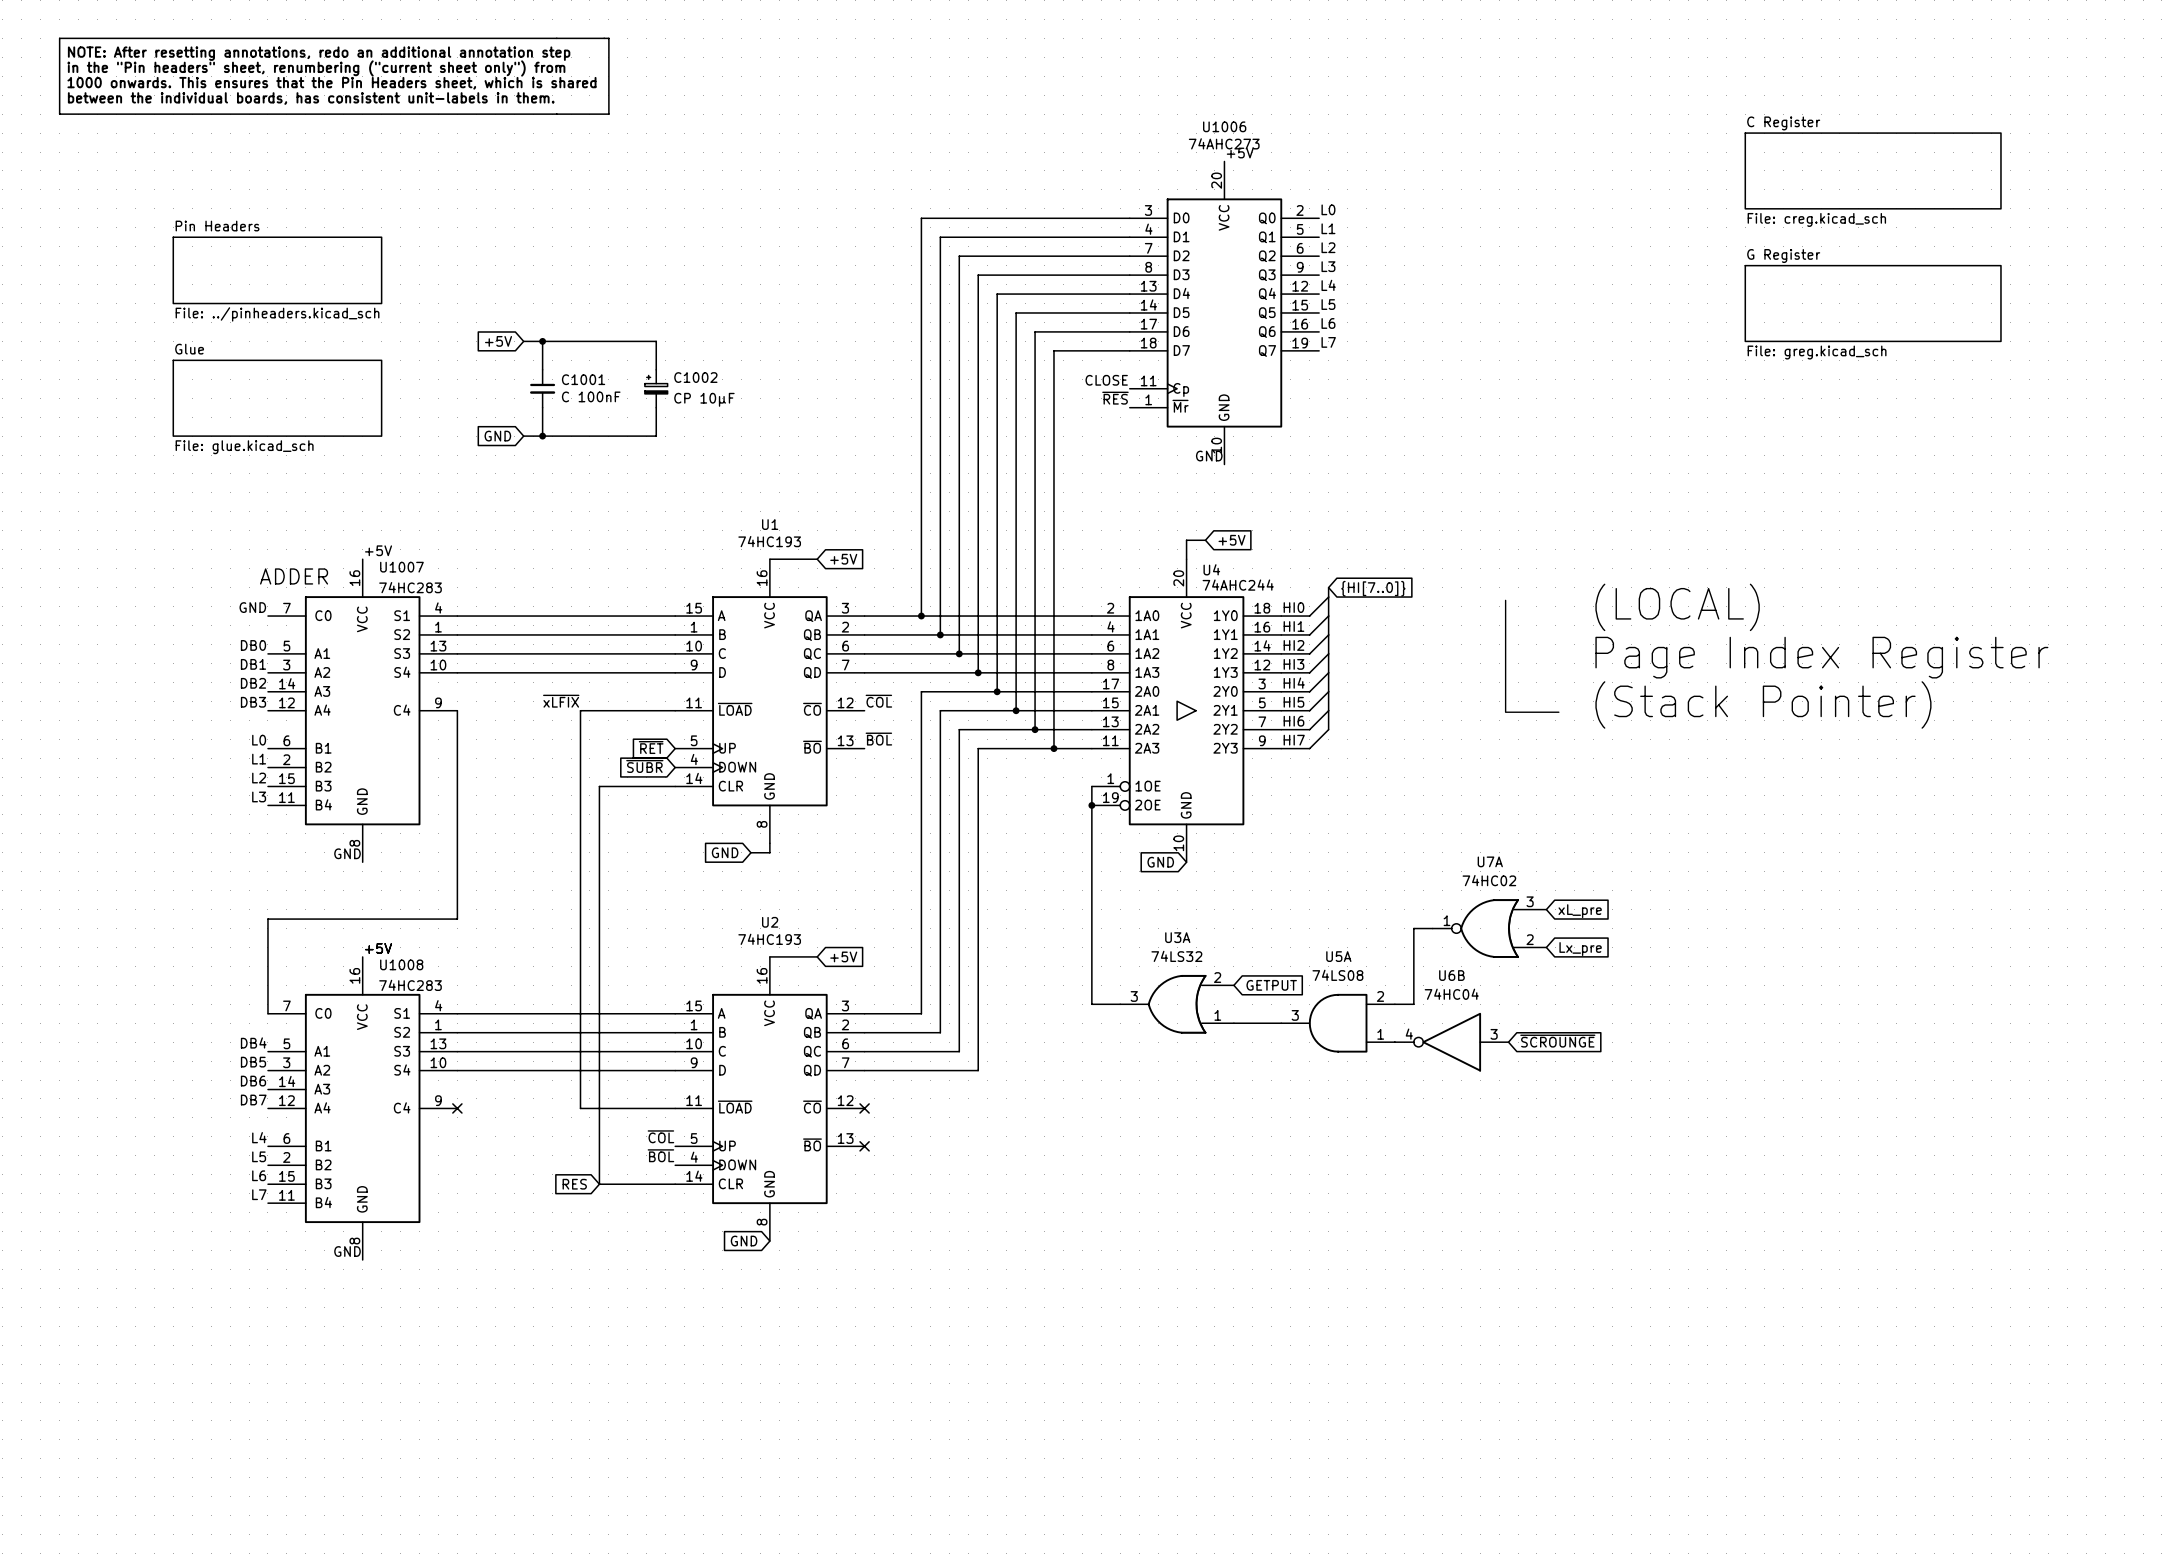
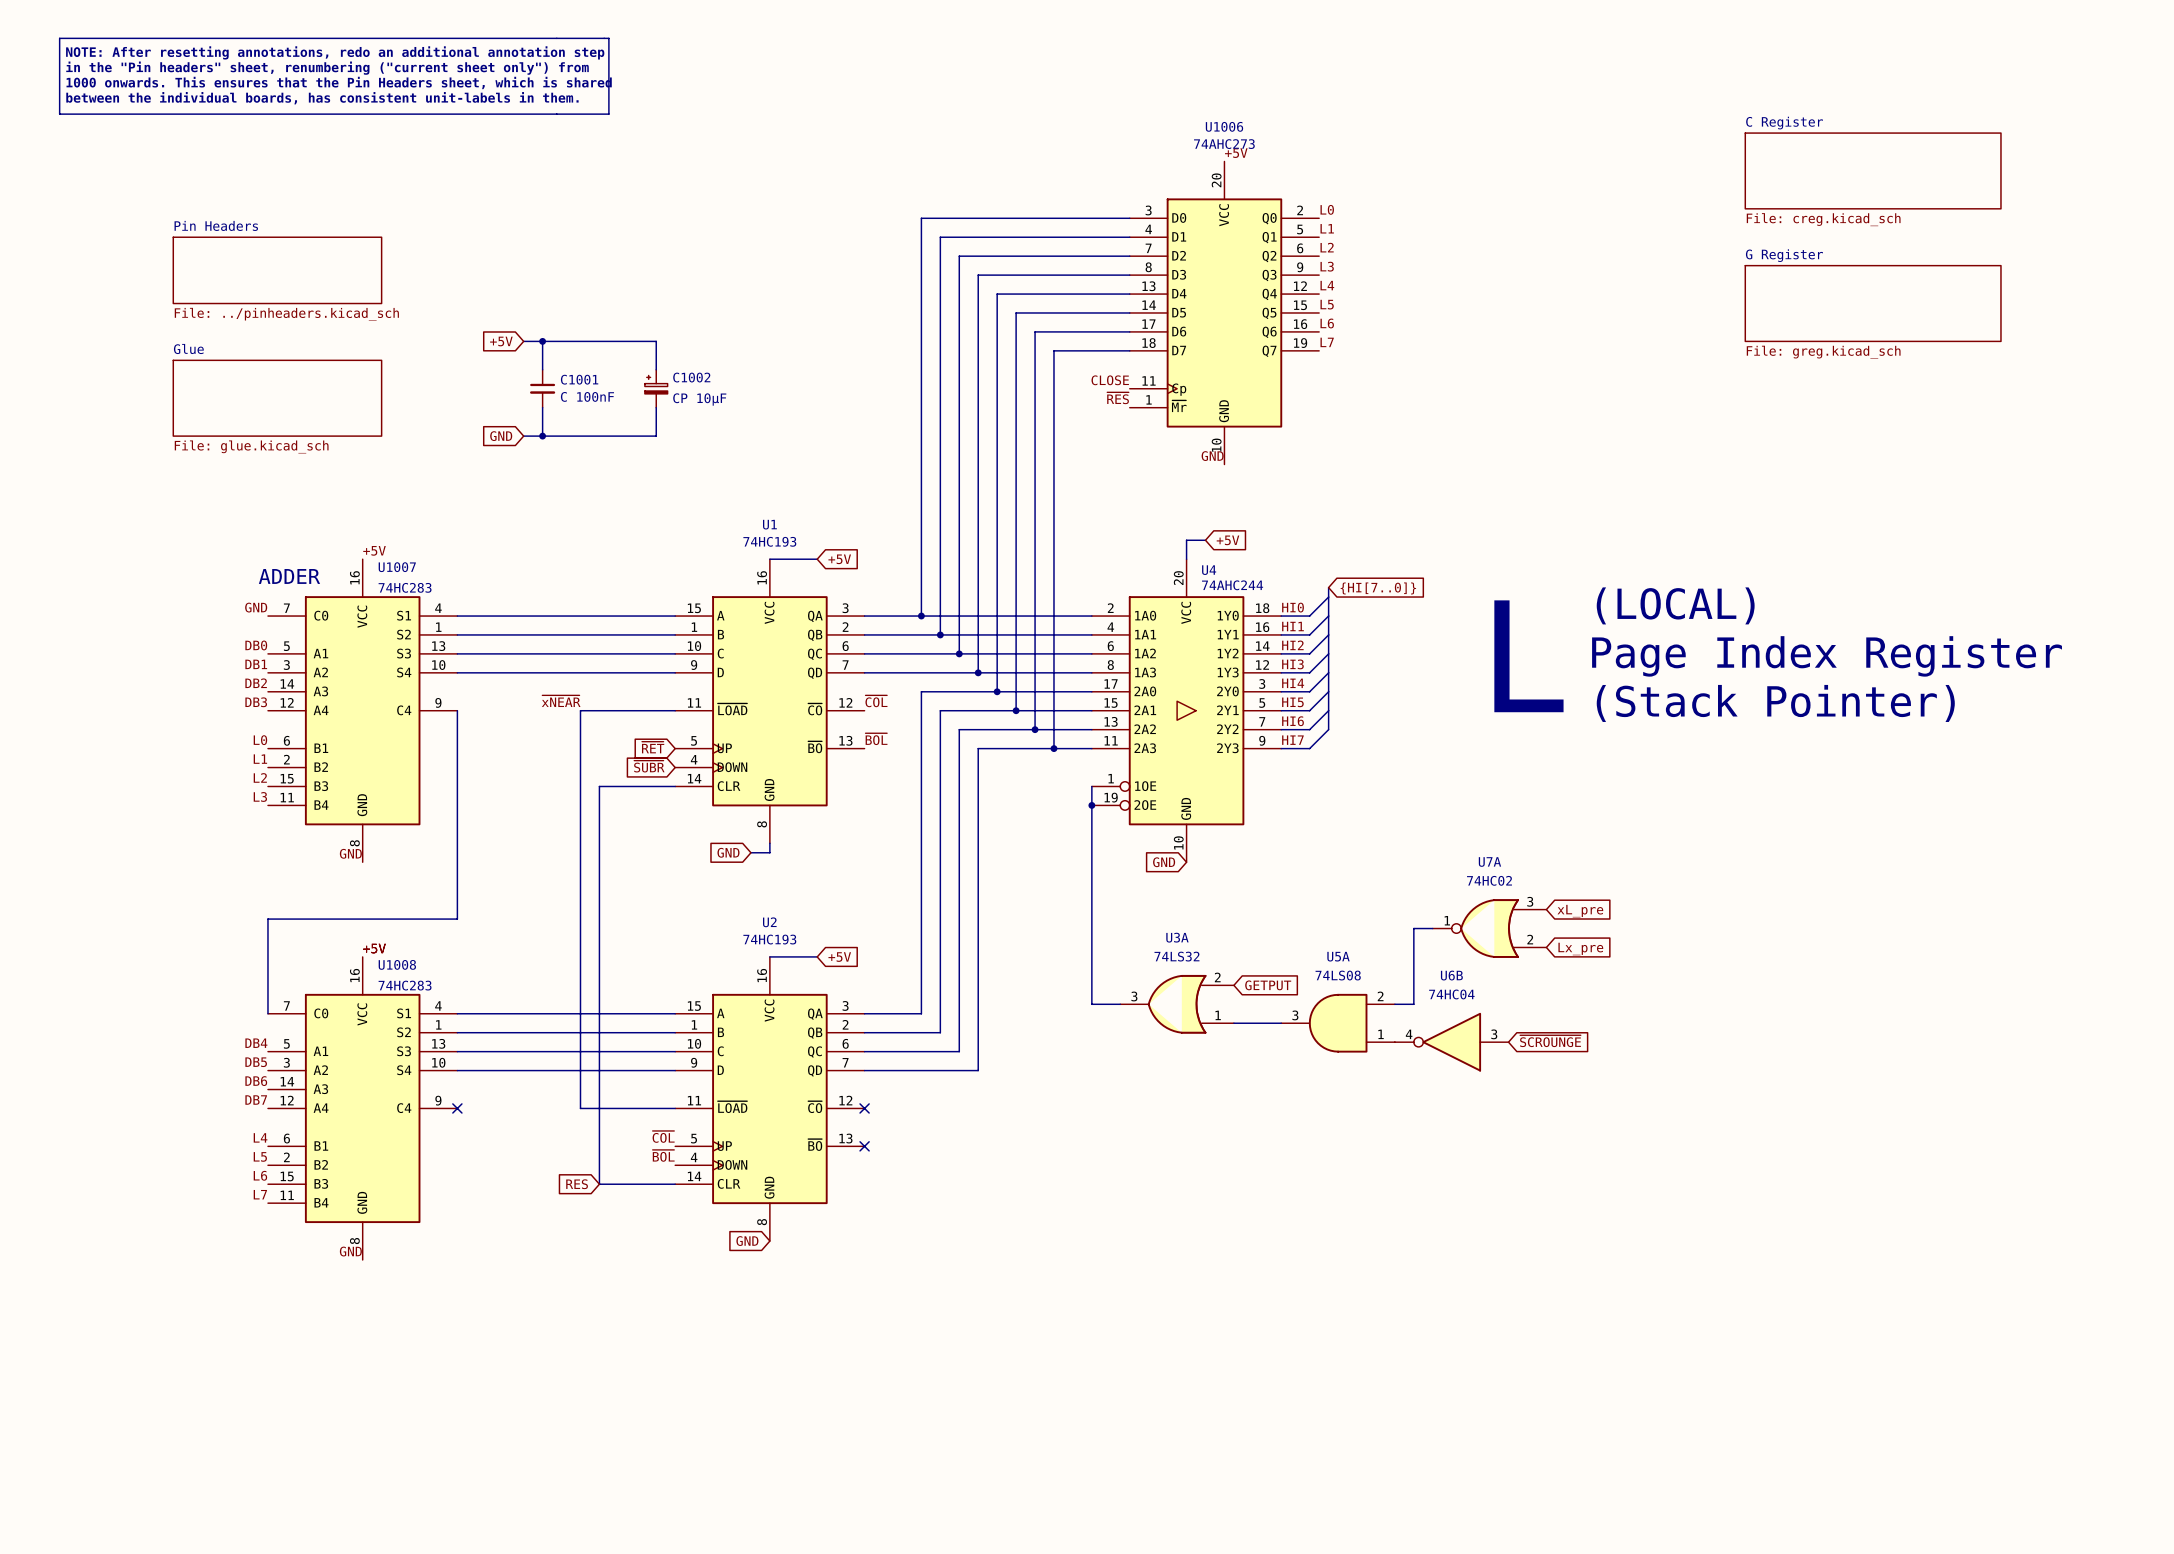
label: ~{xLFIX} (561, 701) -> ~{xNEAR} (561, 701)

